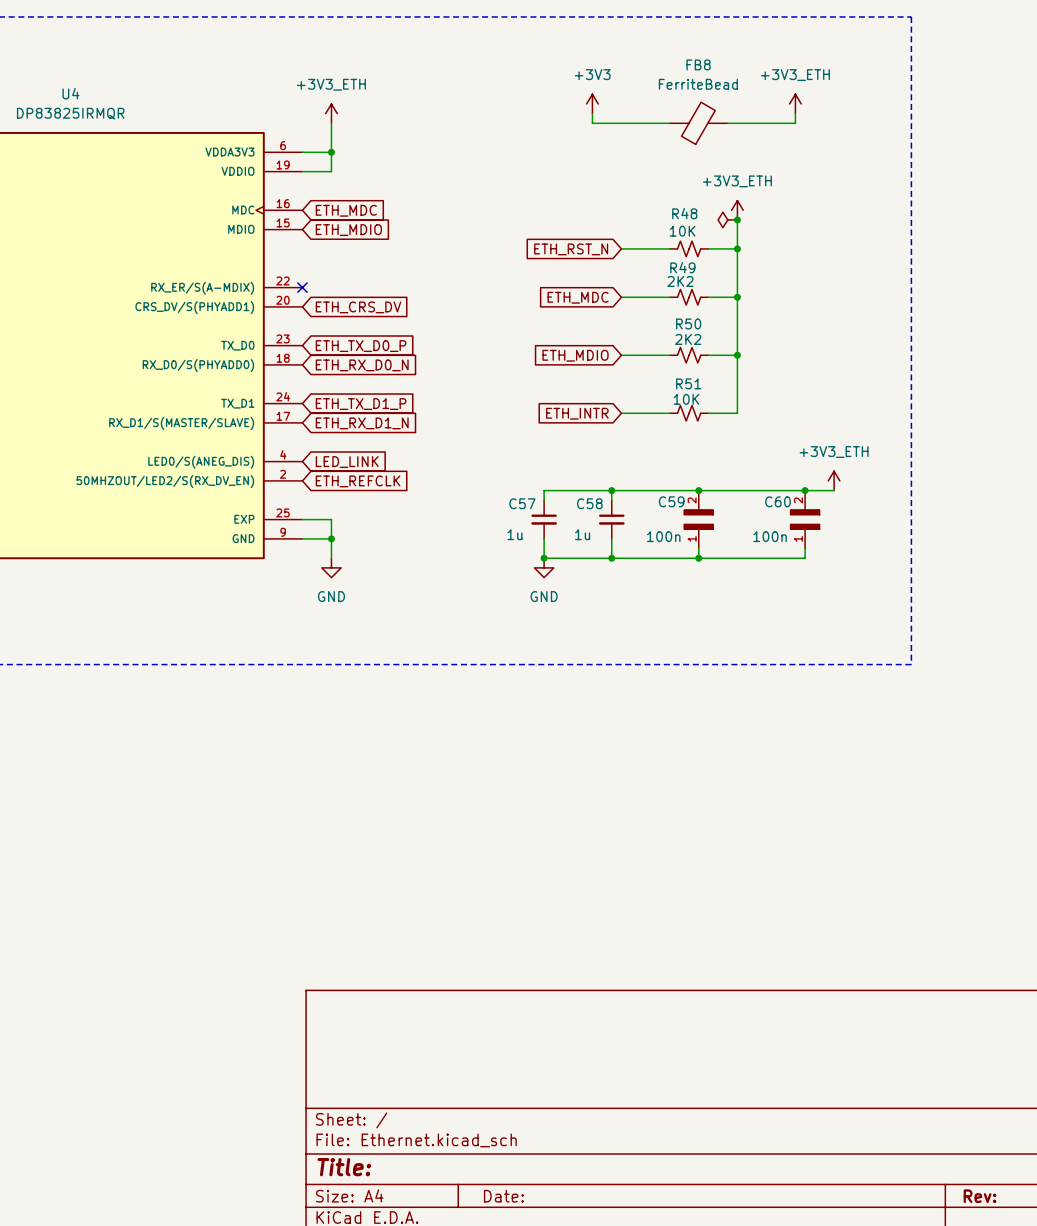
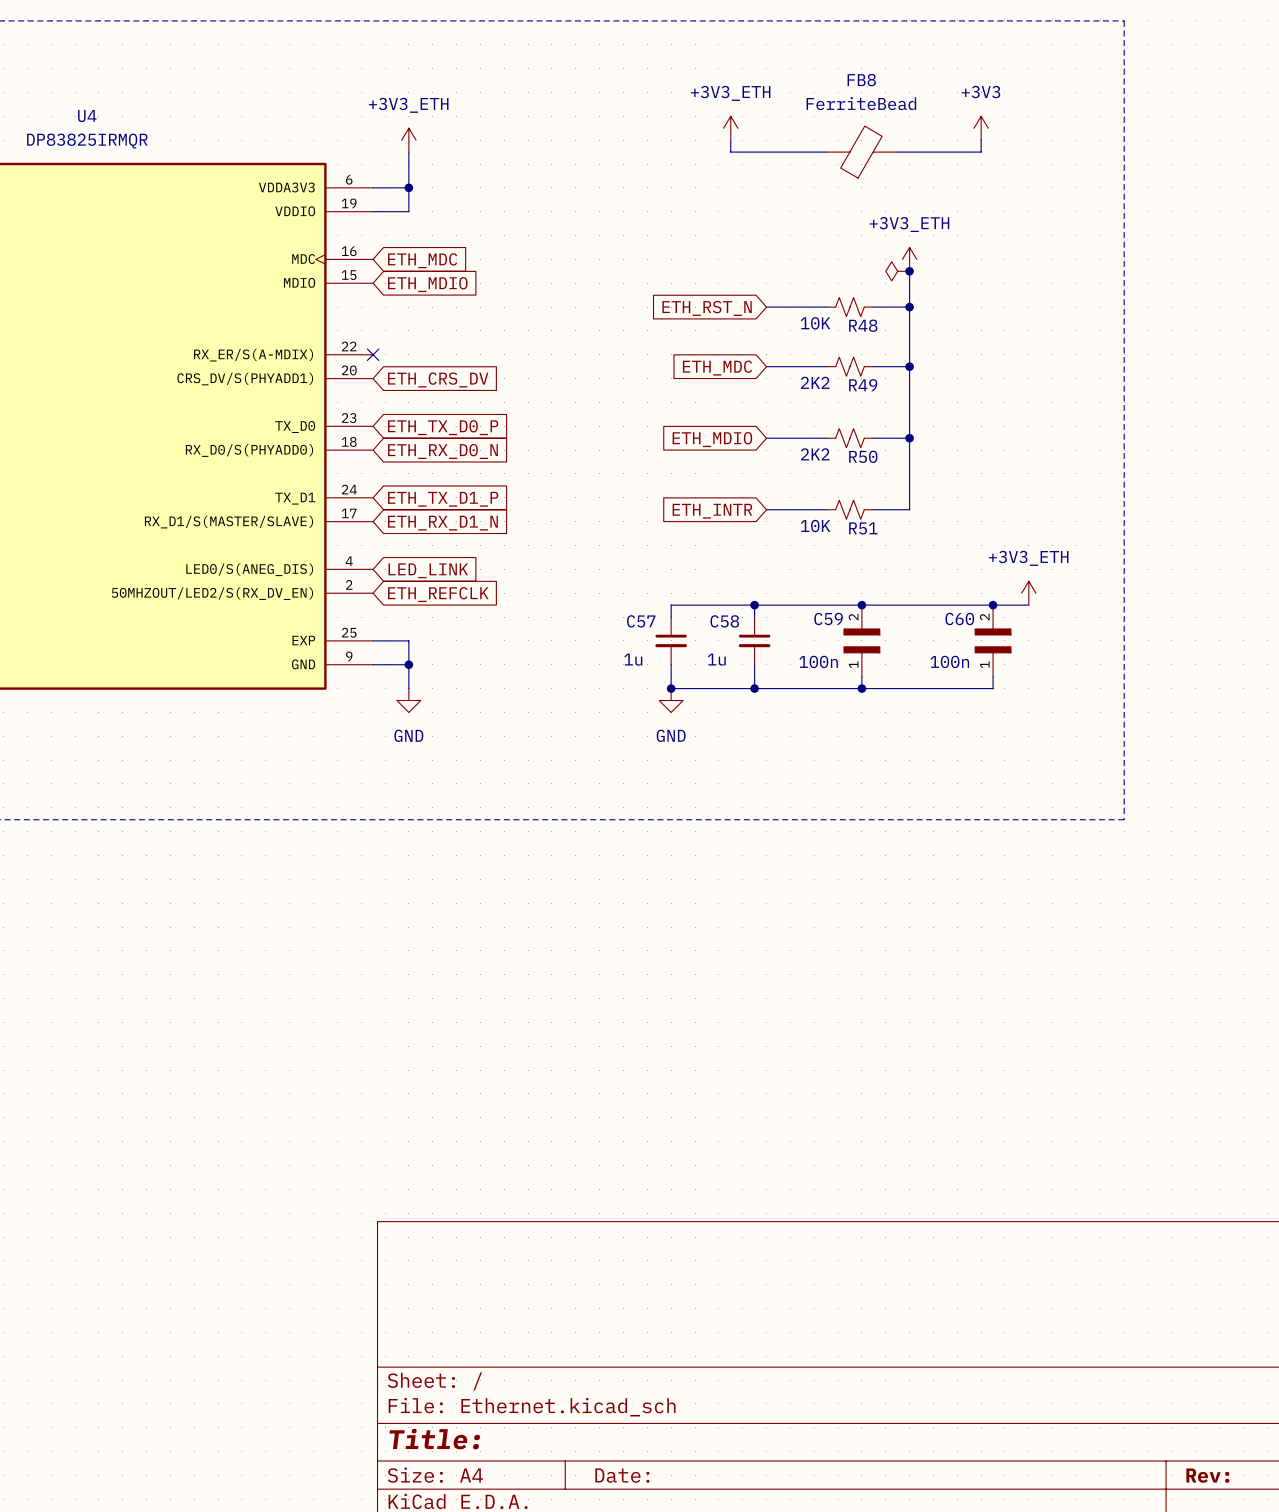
power symbol: +3V3 (592, 103) -> +3V3_ETH (730, 128)
power symbol: +3V3_ETH (795, 103) -> +3V3 (981, 128)
R48 name position: R48 (684, 213) -> R48 (863, 325)
R48 value position: 10K (682, 231) -> 10K (815, 323)
R49 name position: R49 (682, 267) -> R49 (863, 385)
R49 value position: 2K2 (680, 281) -> 2K2 (815, 382)
R50 name position: R50 (688, 323) -> R50 (863, 456)
R50 value position: 2K2 (688, 339) -> 2K2 (815, 454)
R51 name position: R51 (688, 383) -> R51 (863, 528)
R51 value position: 10K (686, 399) -> 10K (815, 526)

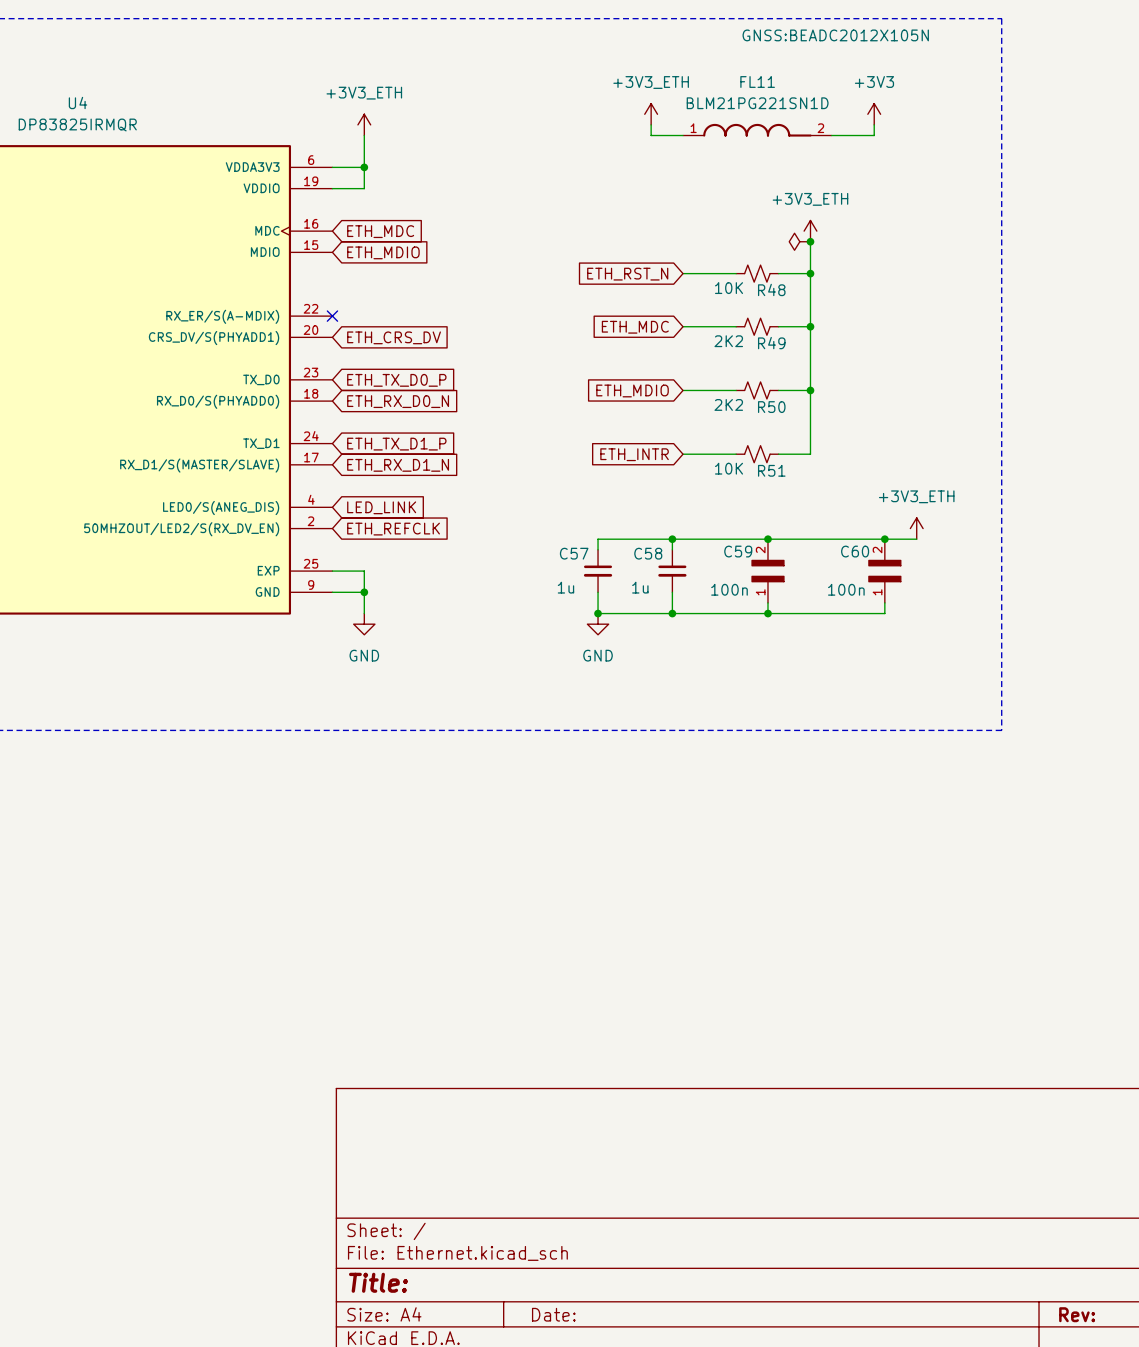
FL11: none -> BLM21PG221SN1D (757, 130)
wire: (766, 152) (826, 152) -> none
FB8: FerriteBead (861, 152) -> none

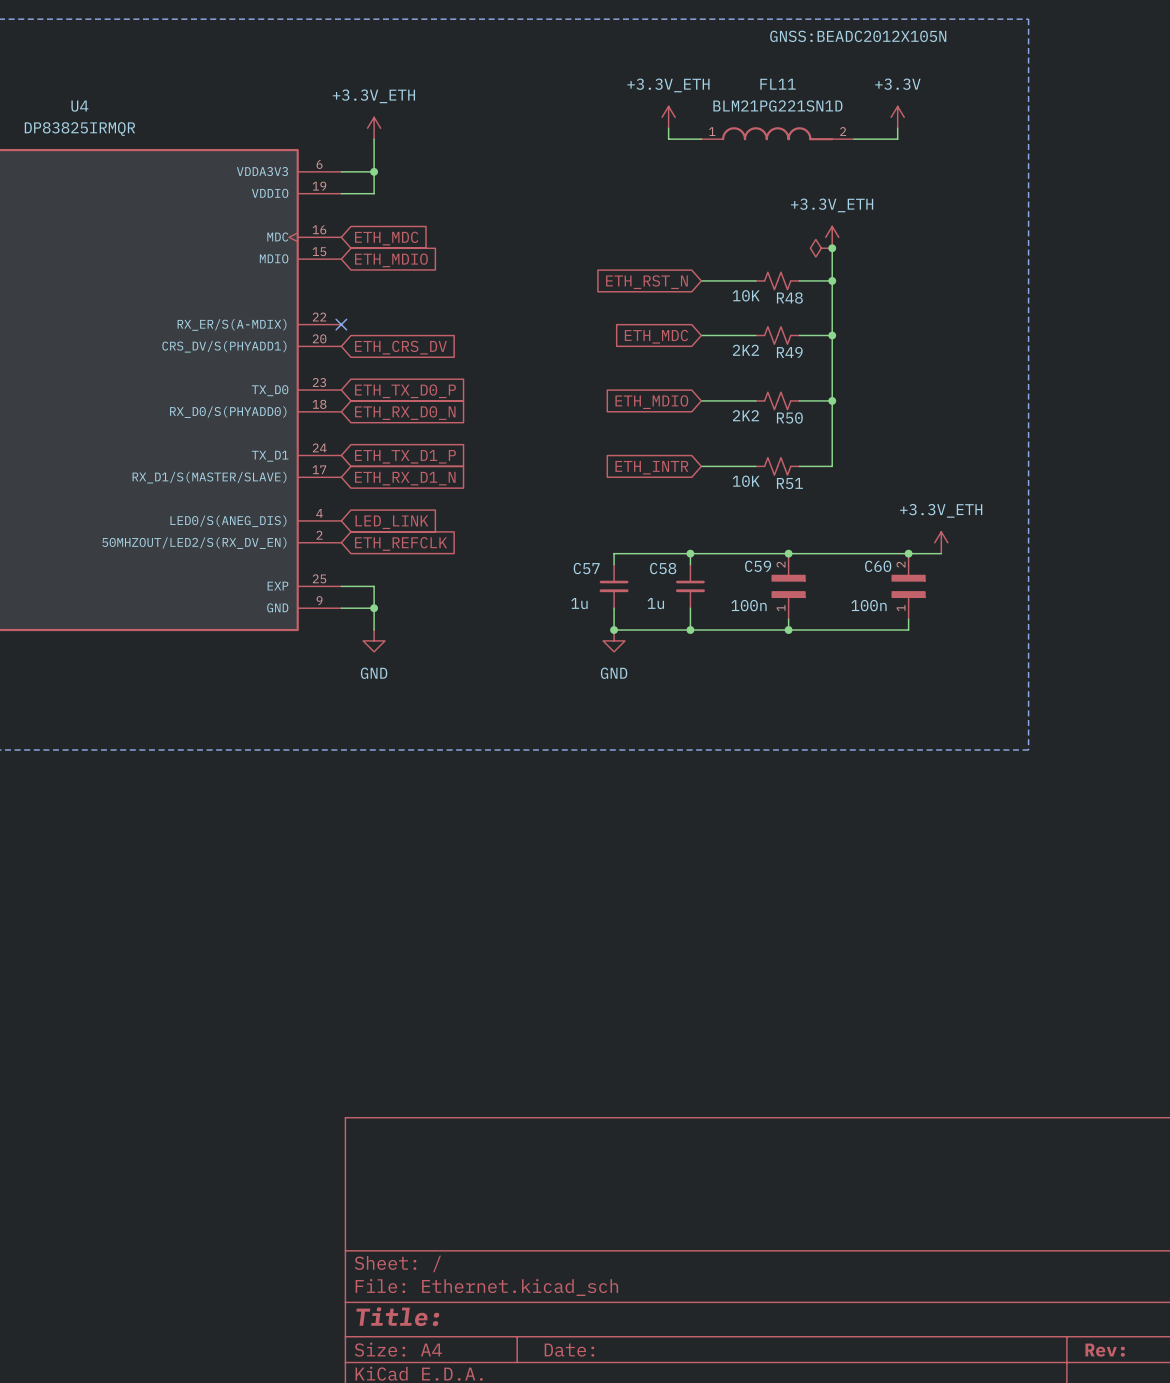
power symbol: +3V3_ETH (651, 114) -> +3.3V_ETH (668, 117)
power symbol: +3V3 (874, 114) -> +3.3V (897, 117)
power symbol: +3V3_ETH (364, 124) -> +3.3V_ETH (374, 128)
power symbol: +3V3_ETH (810, 231) -> +3.3V_ETH (832, 237)
power symbol: +3V3_ETH (916, 528) -> +3.3V_ETH (941, 542)

